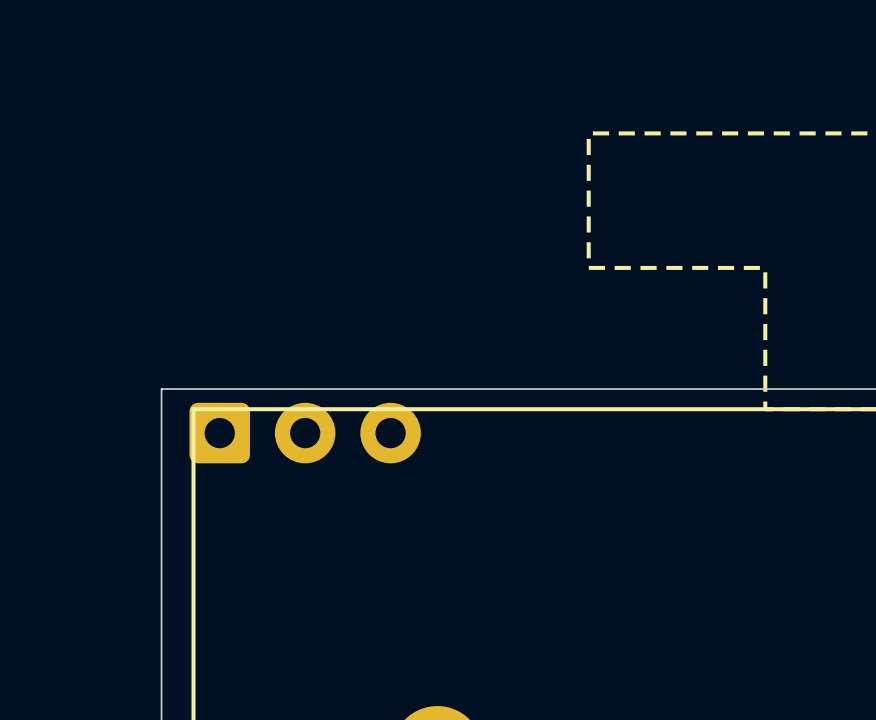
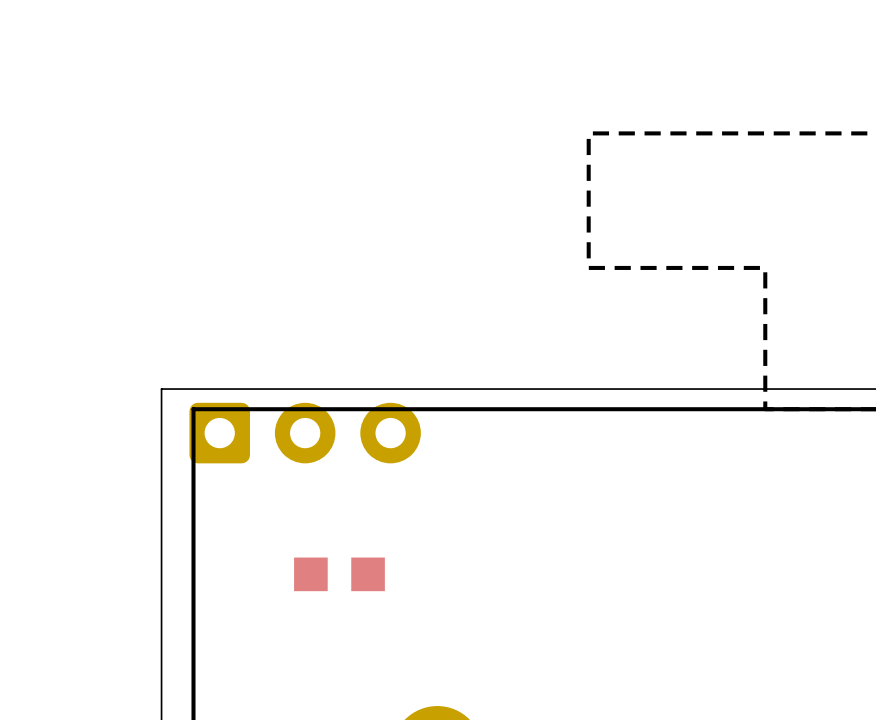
part: none -> (339, 574)

